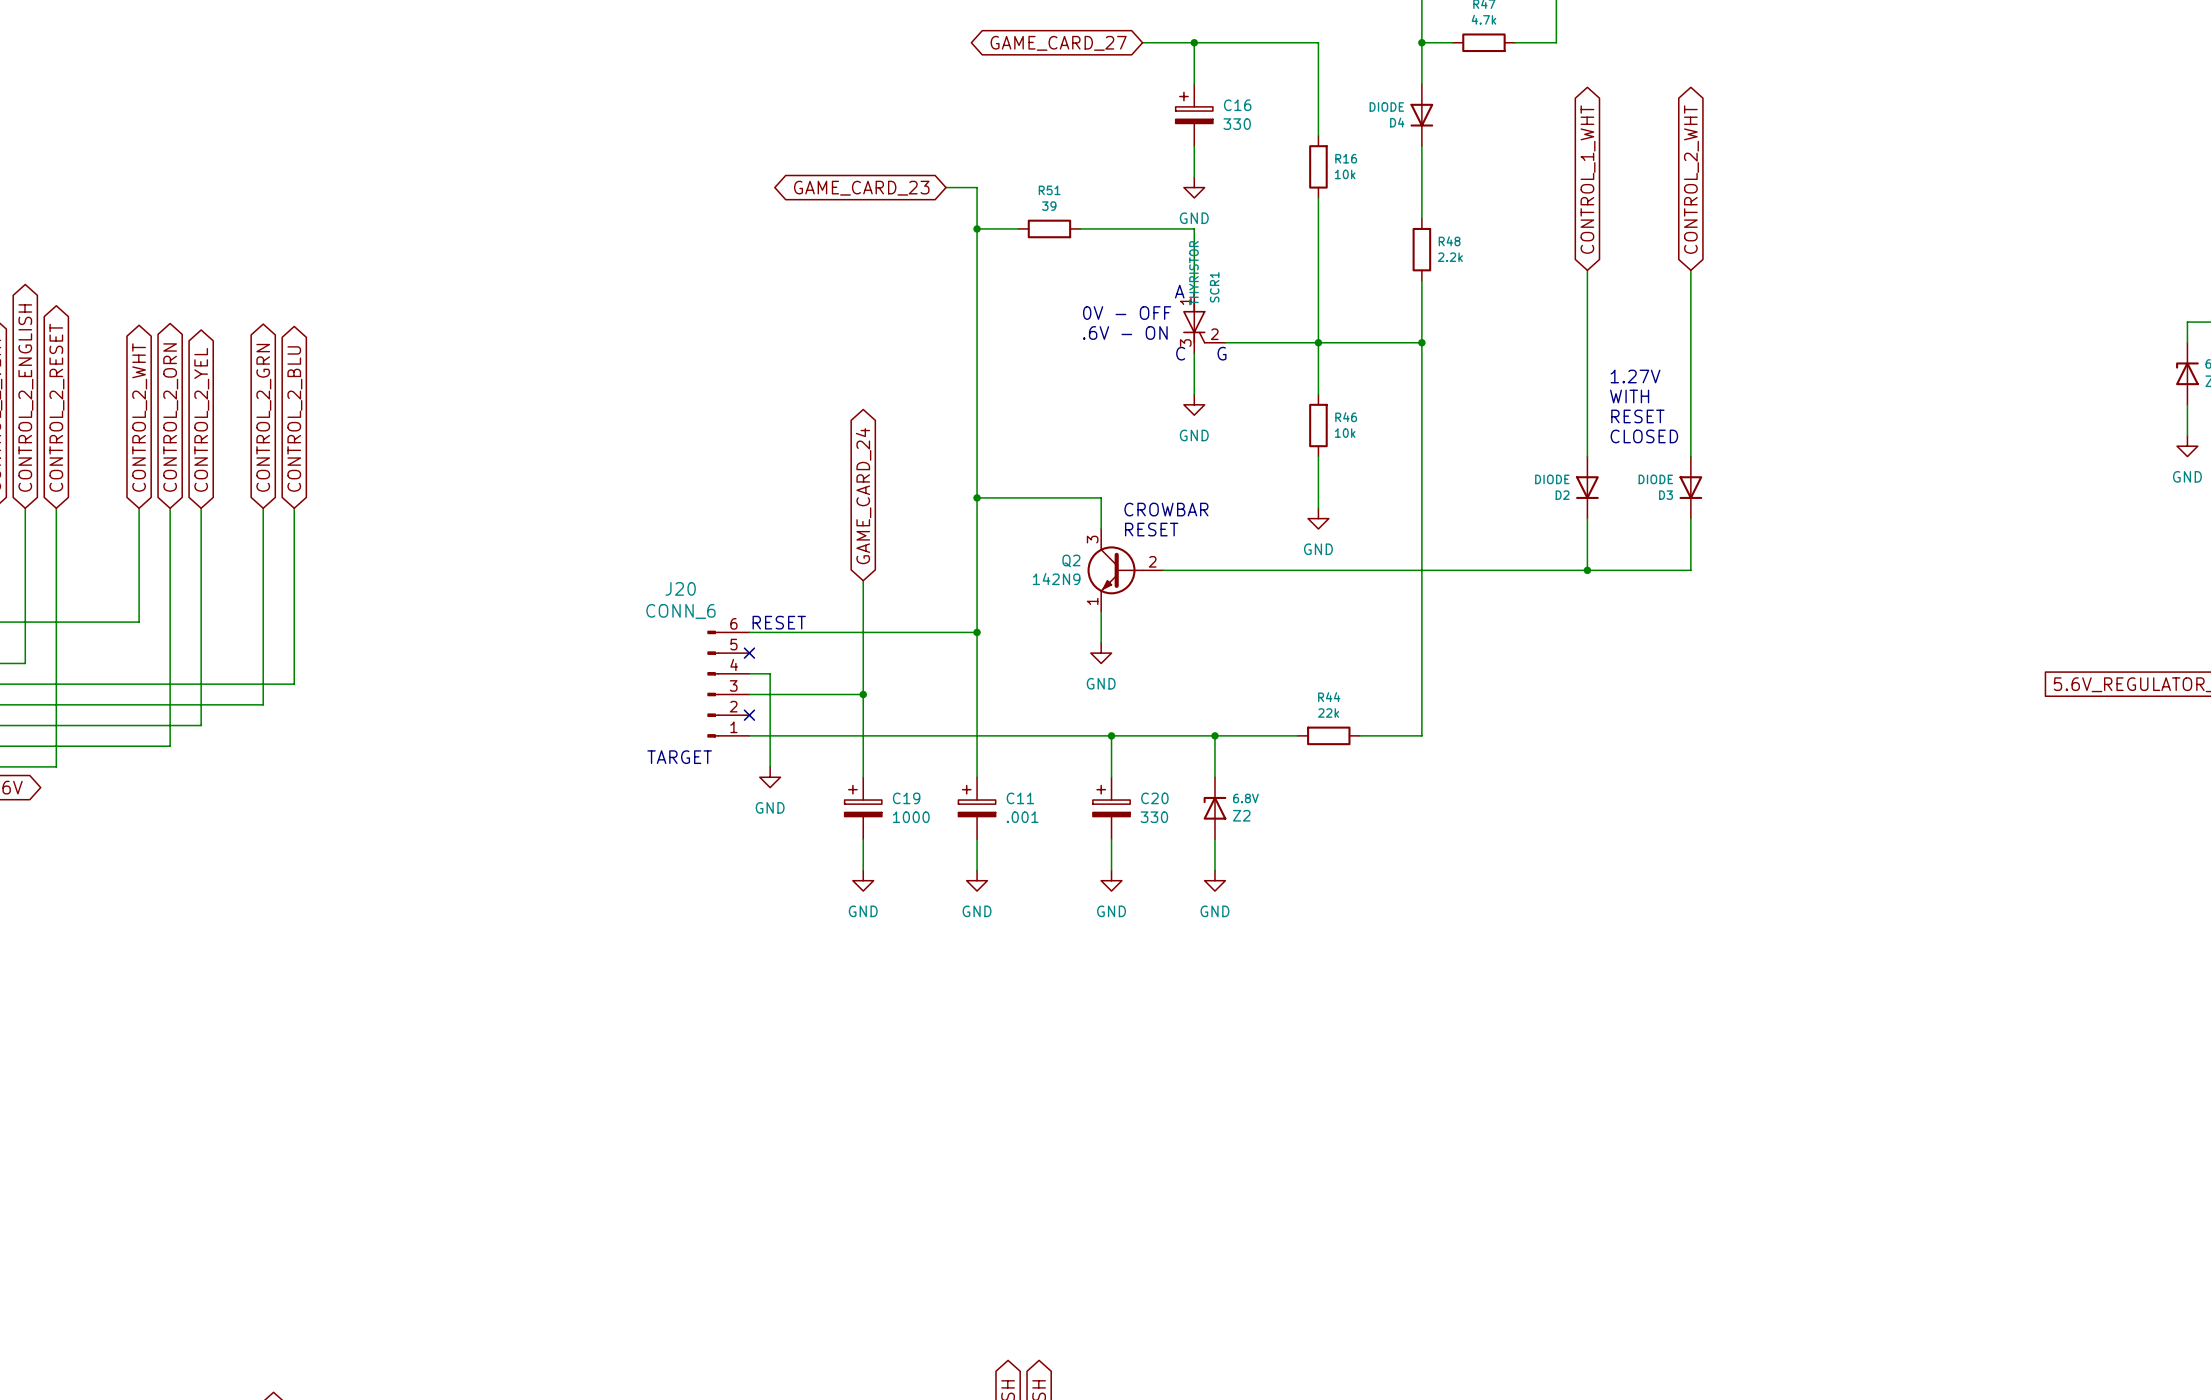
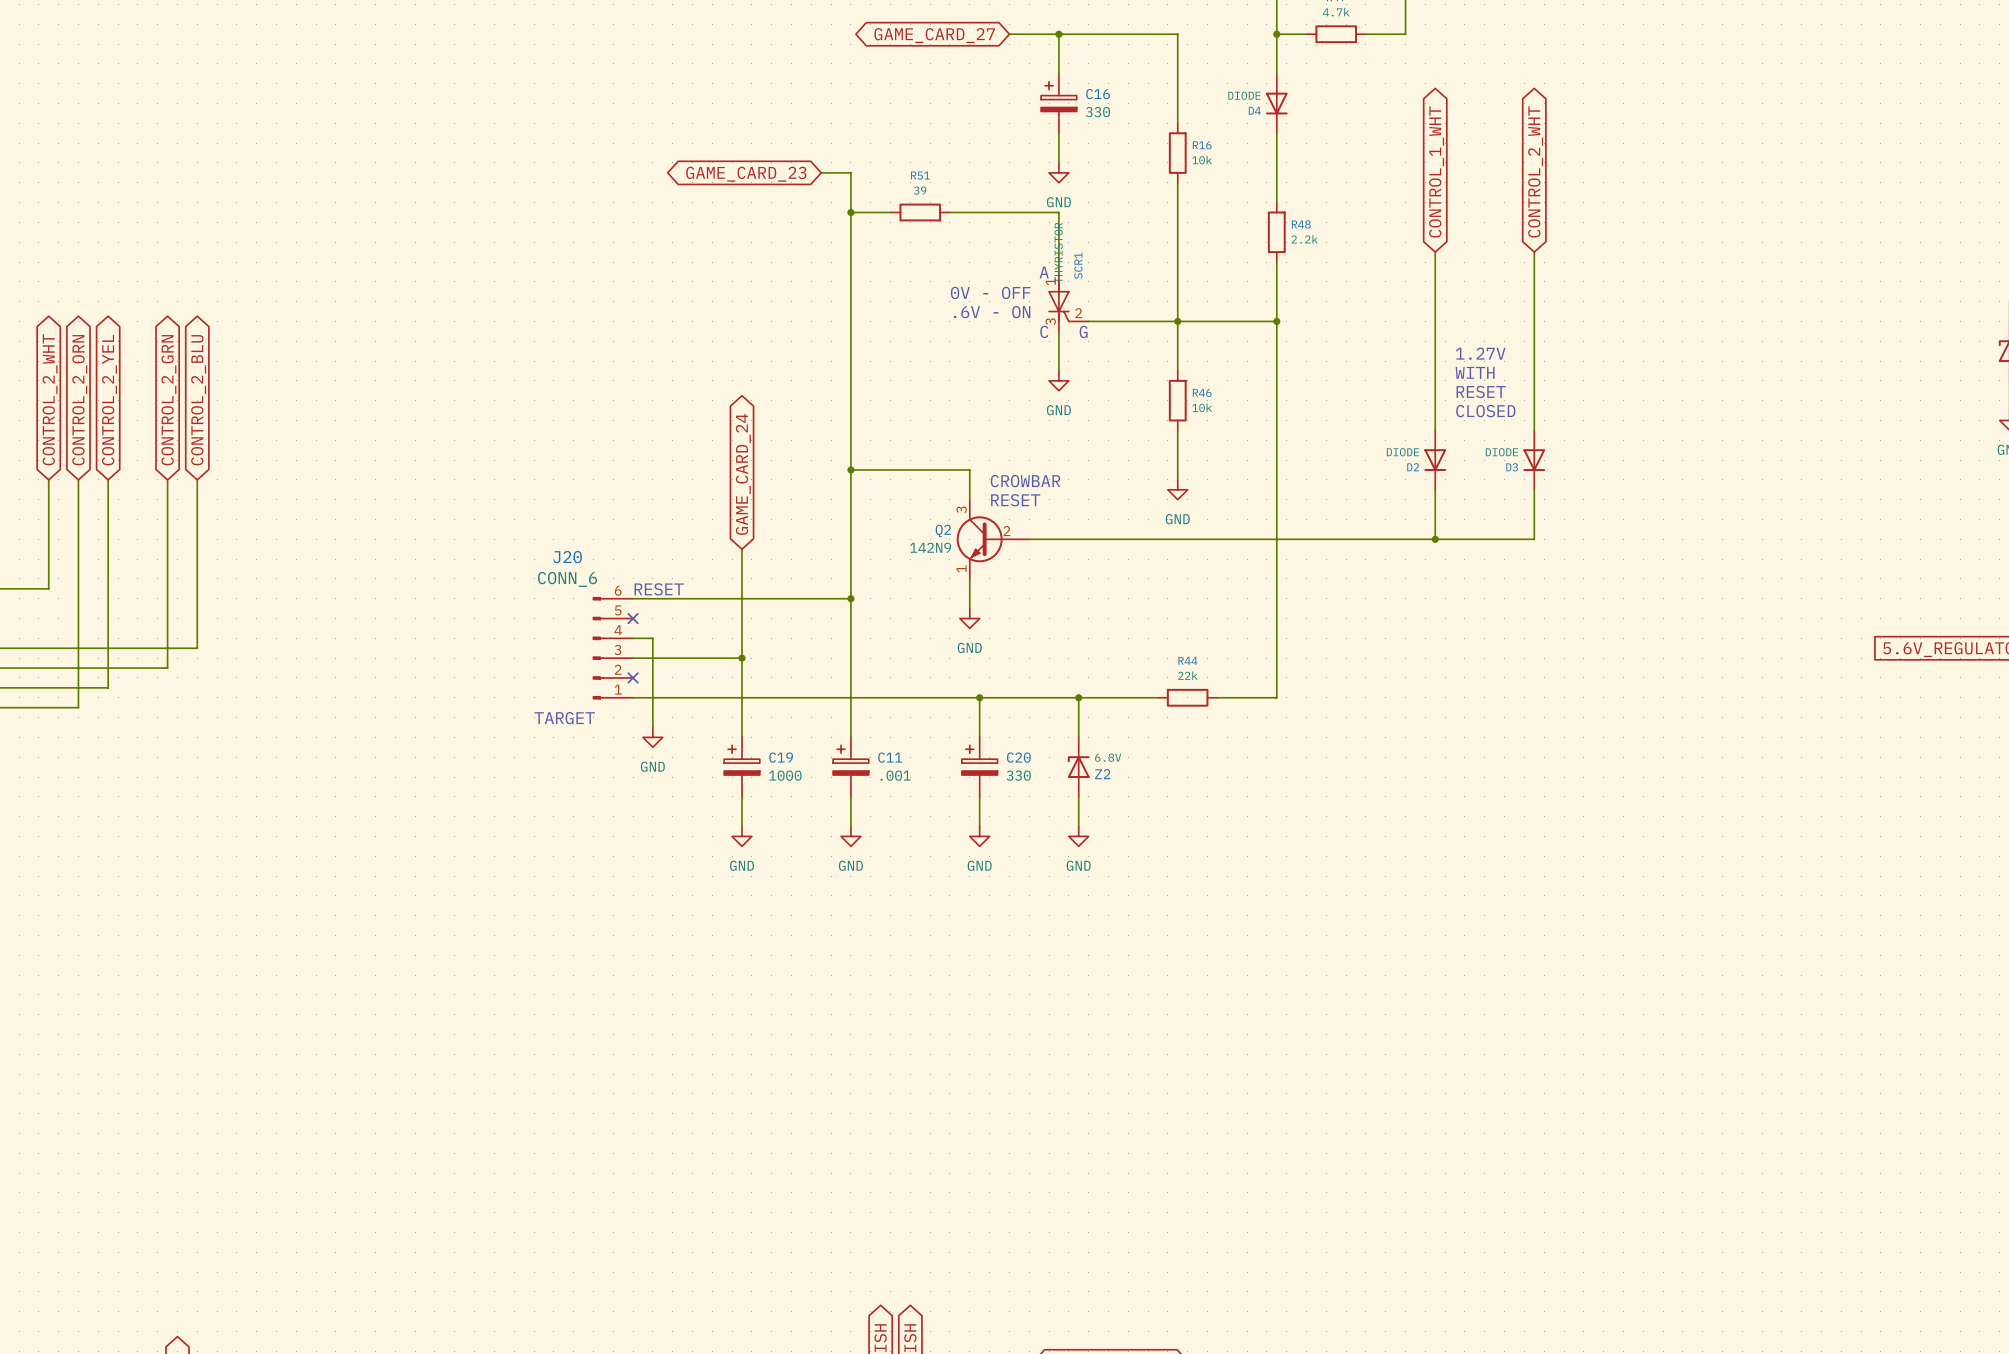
Q2 symbol: [1087, 528, 1164, 612] -> [956, 499, 1030, 579]

